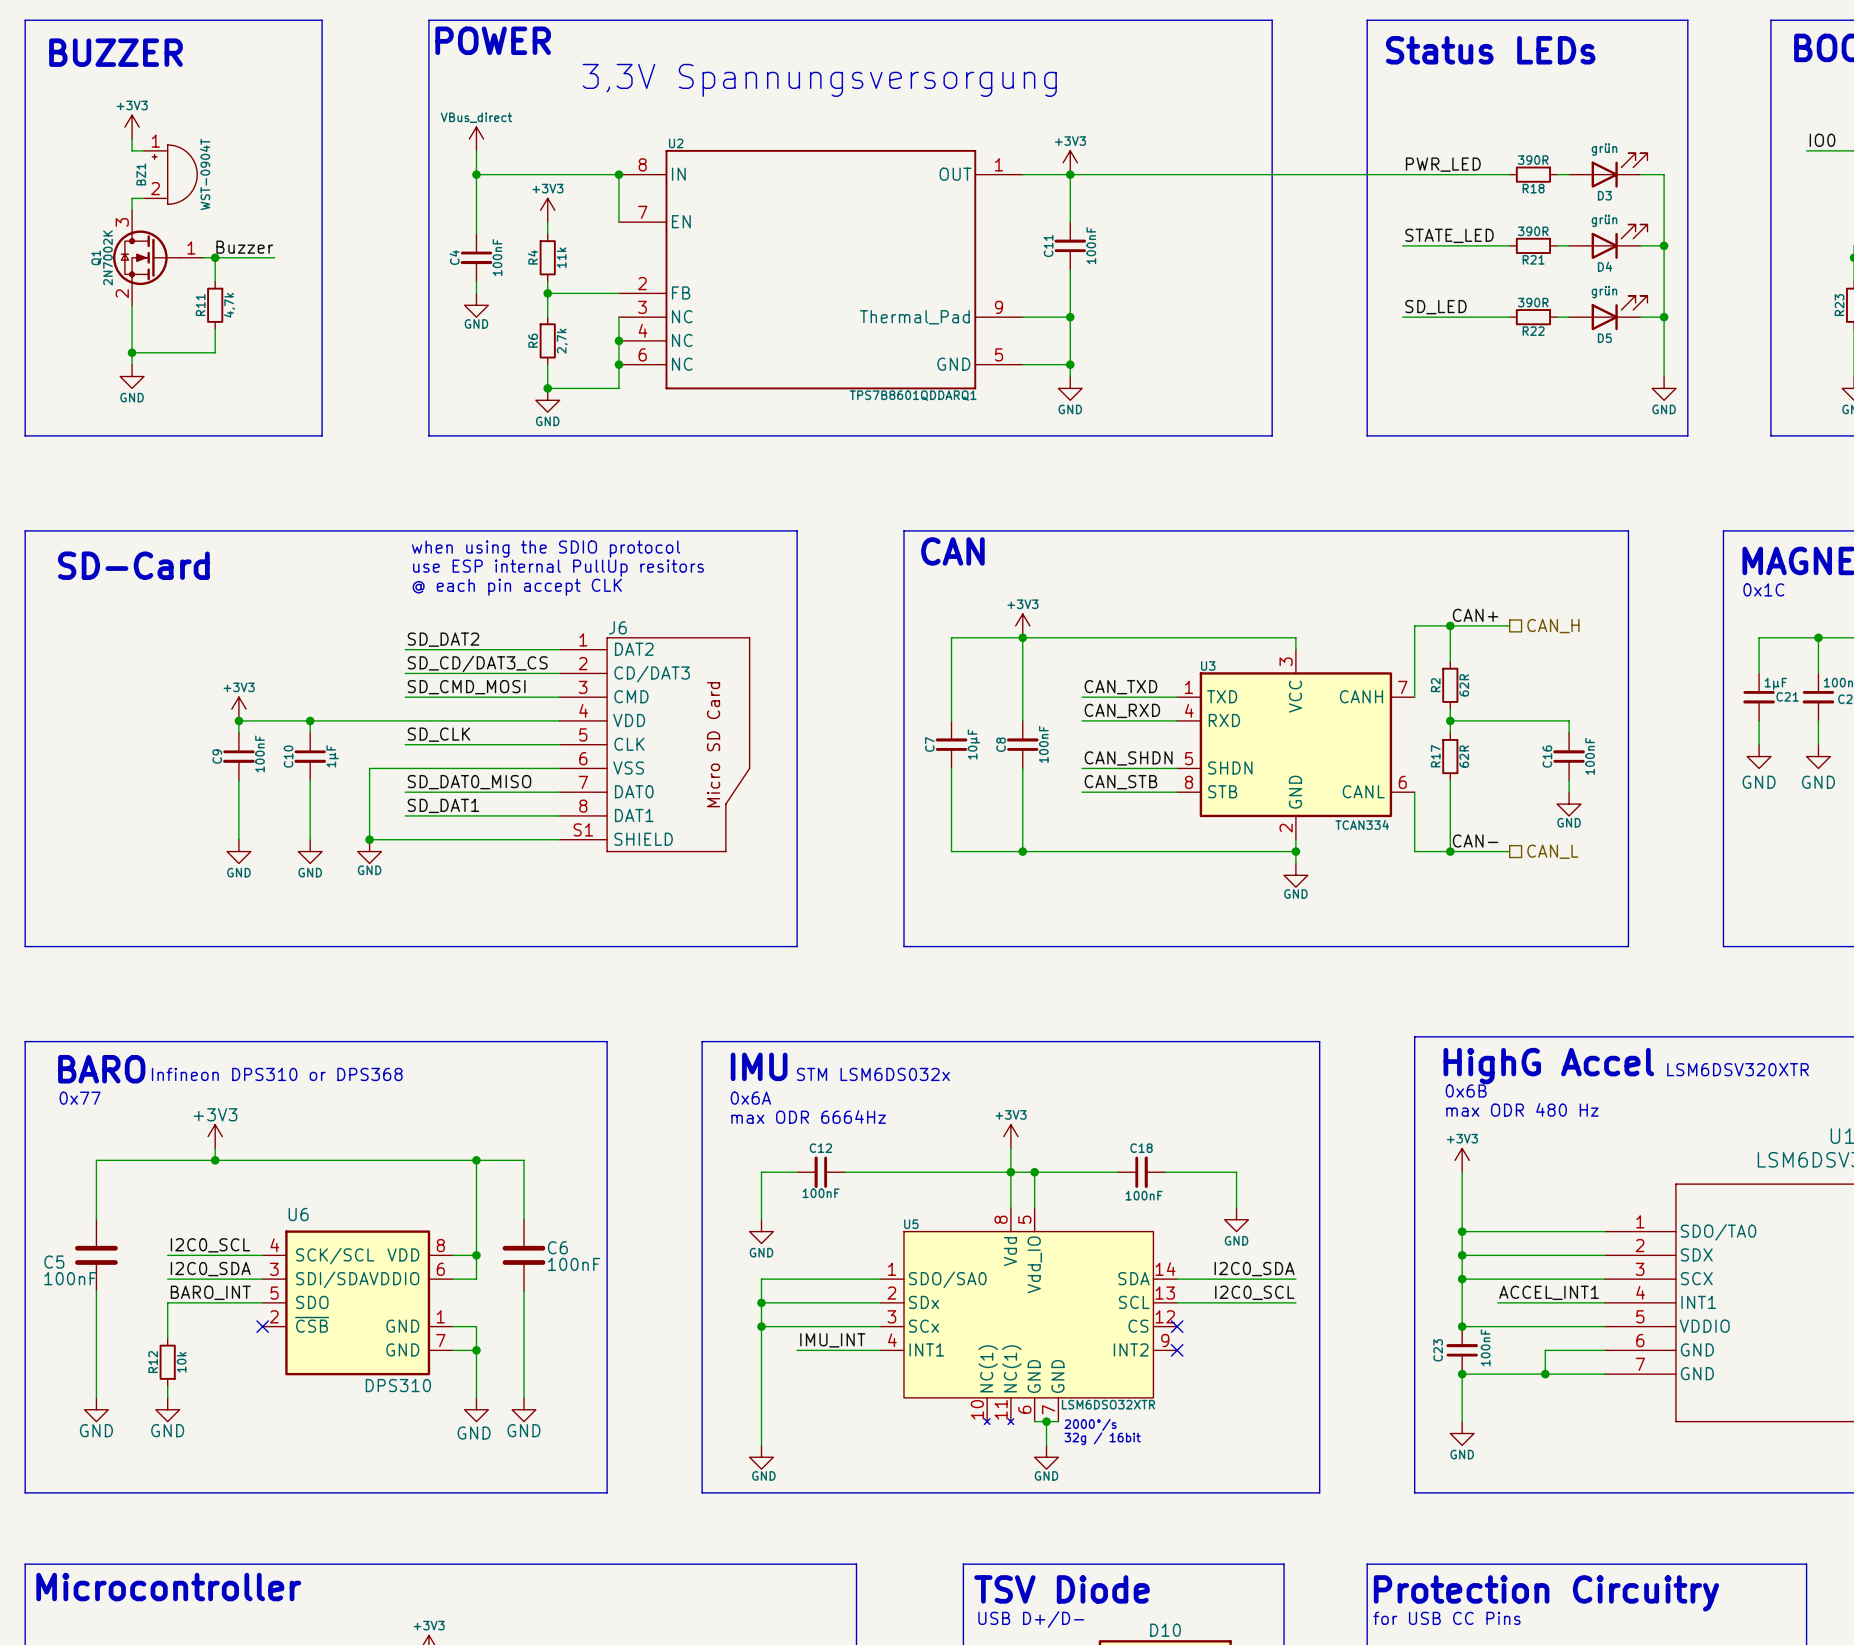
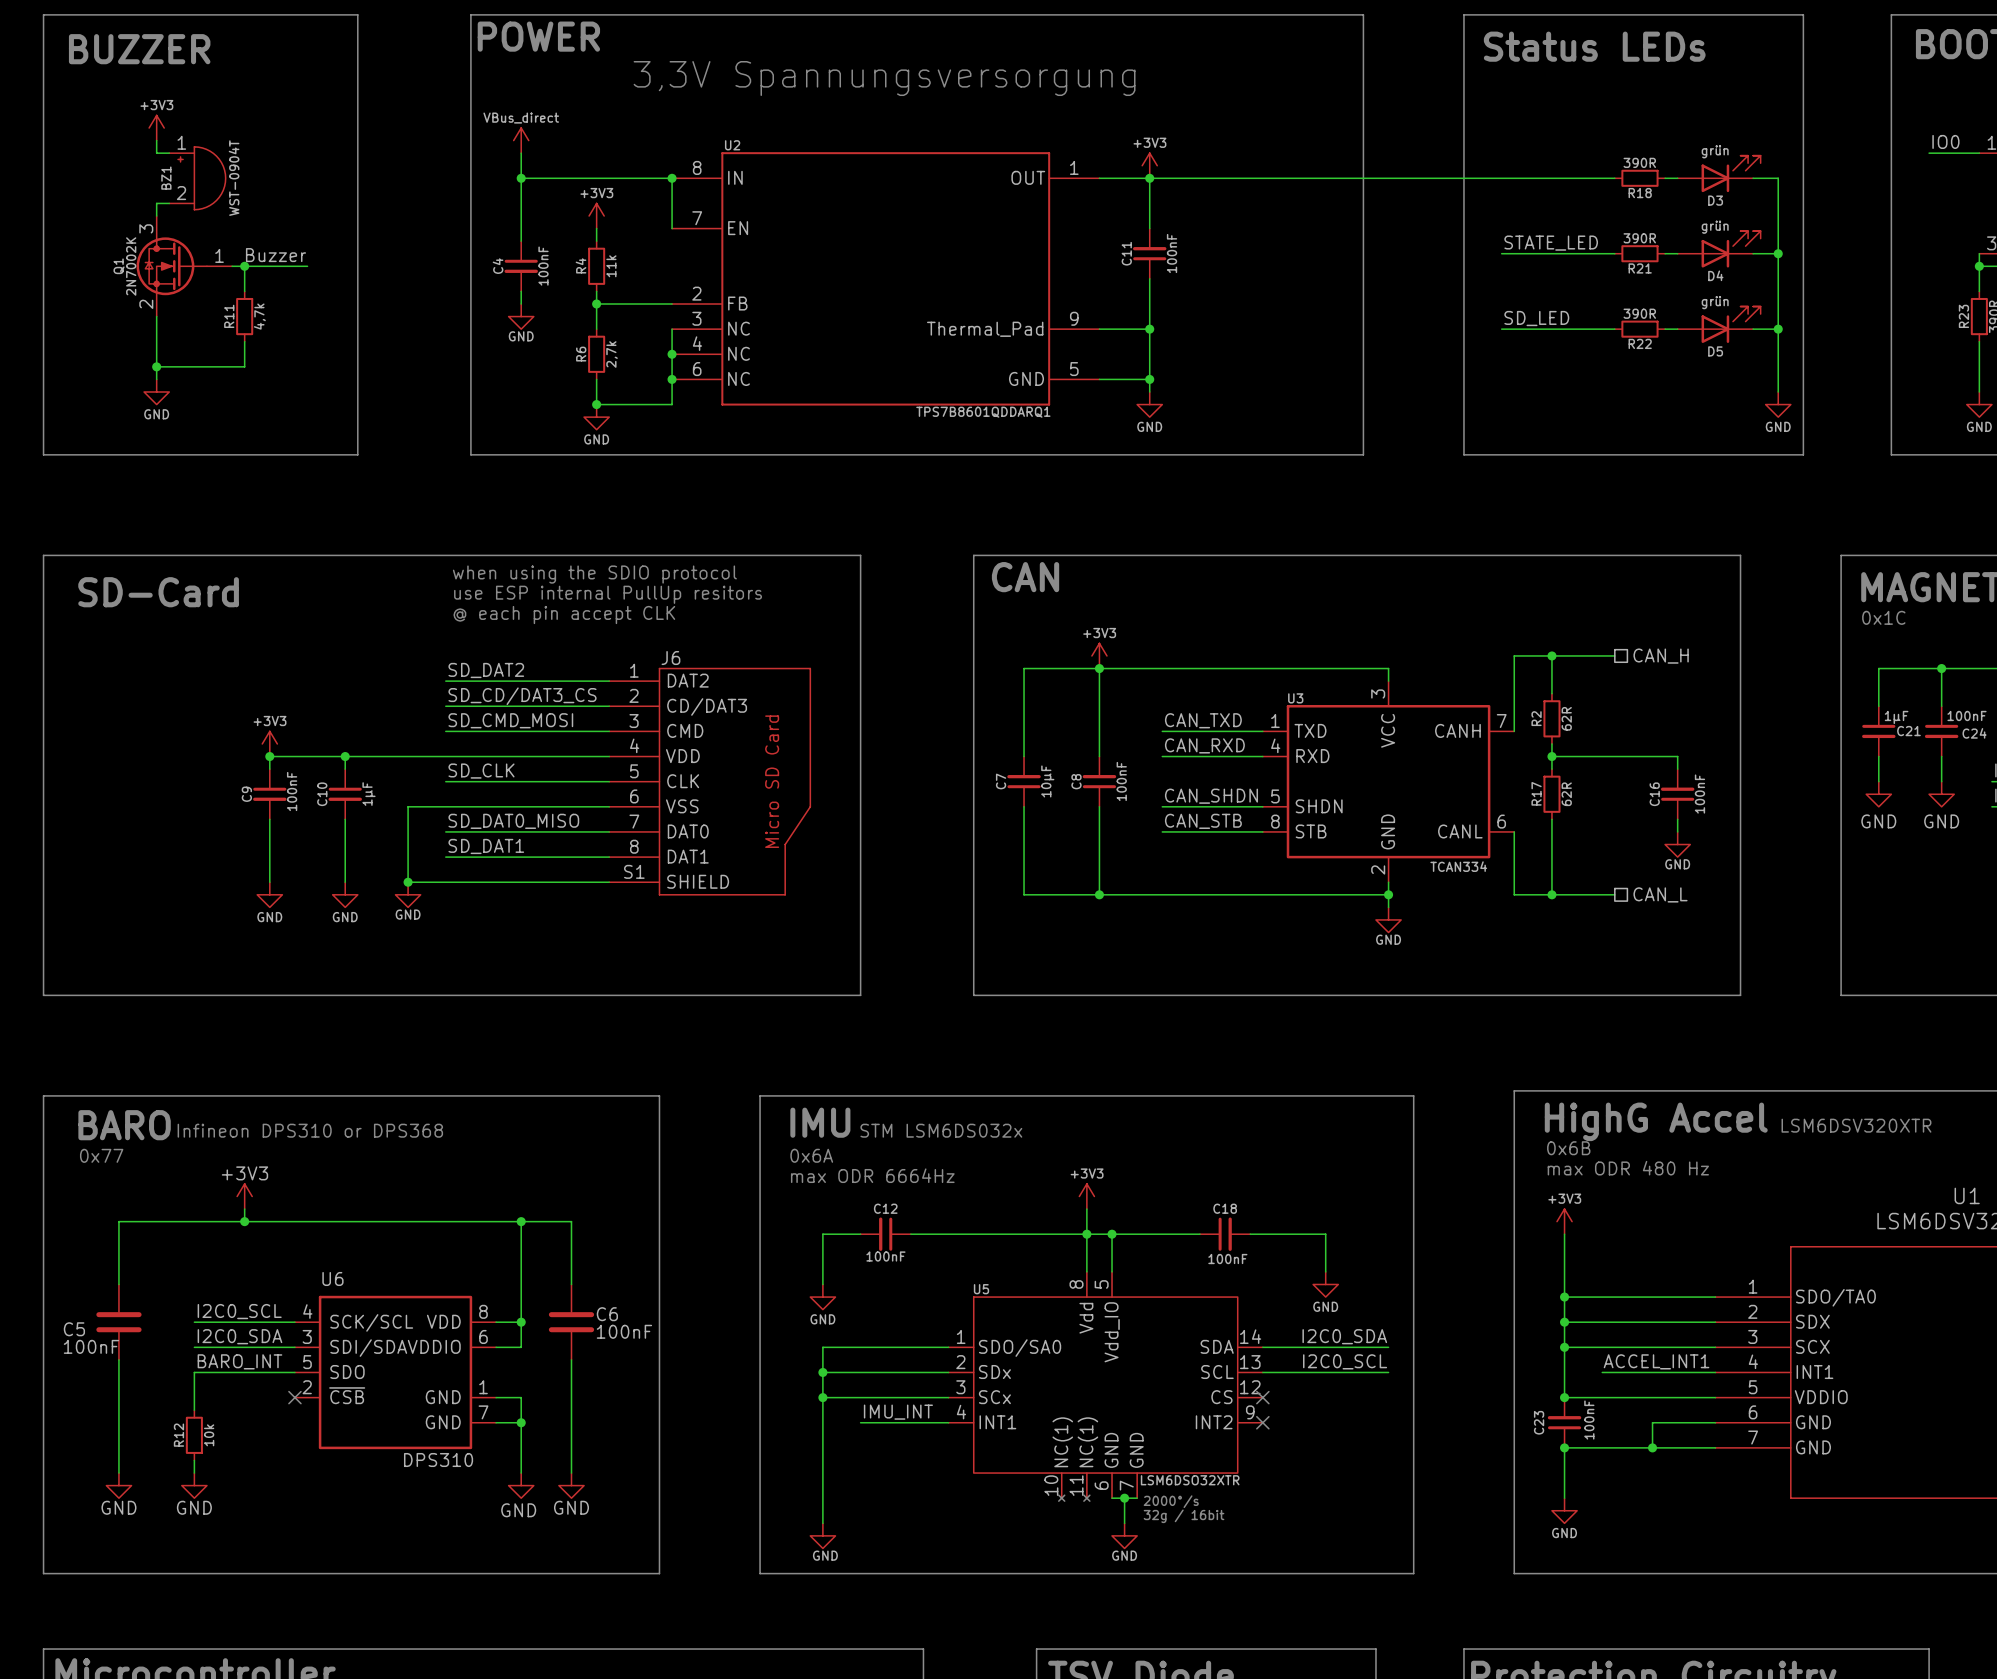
label: PWR_LED (1443, 164) -> none
label: CAN+ (1475, 615) -> none
label: CAN- (1475, 840) -> none

